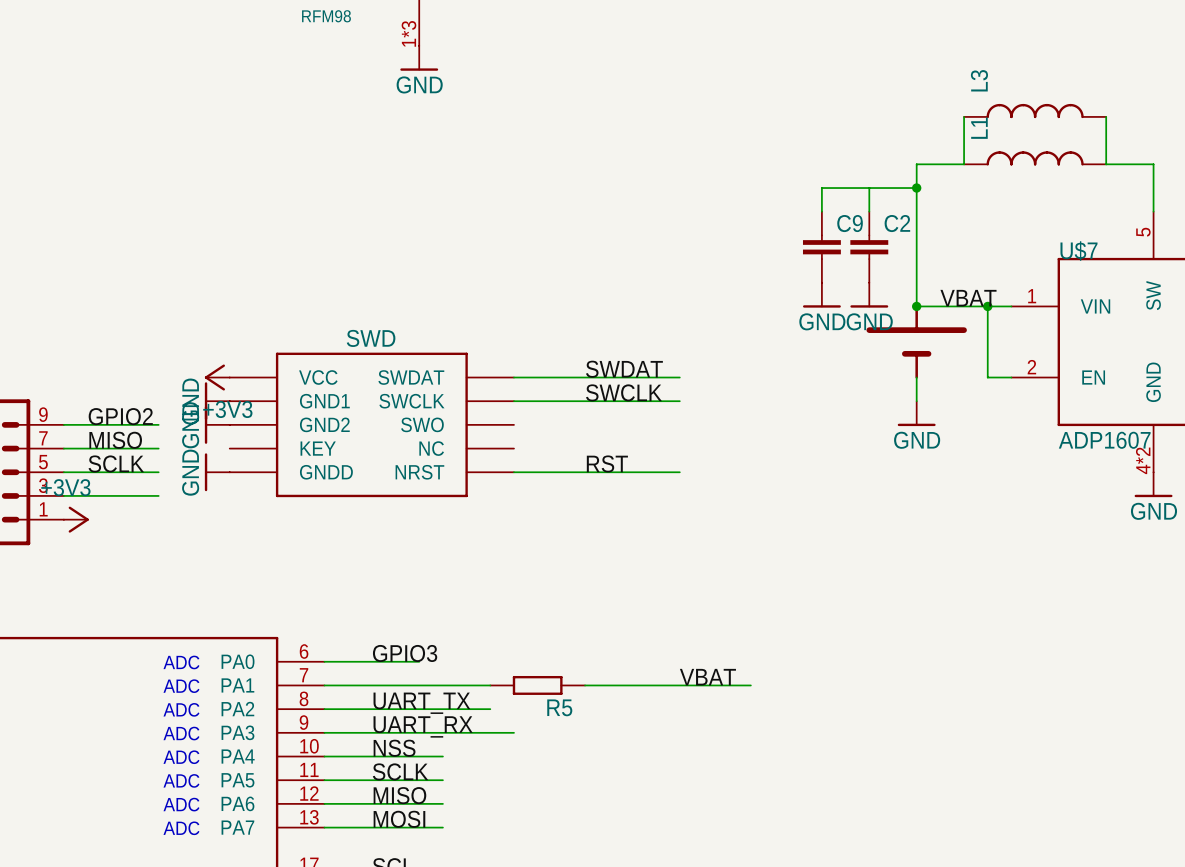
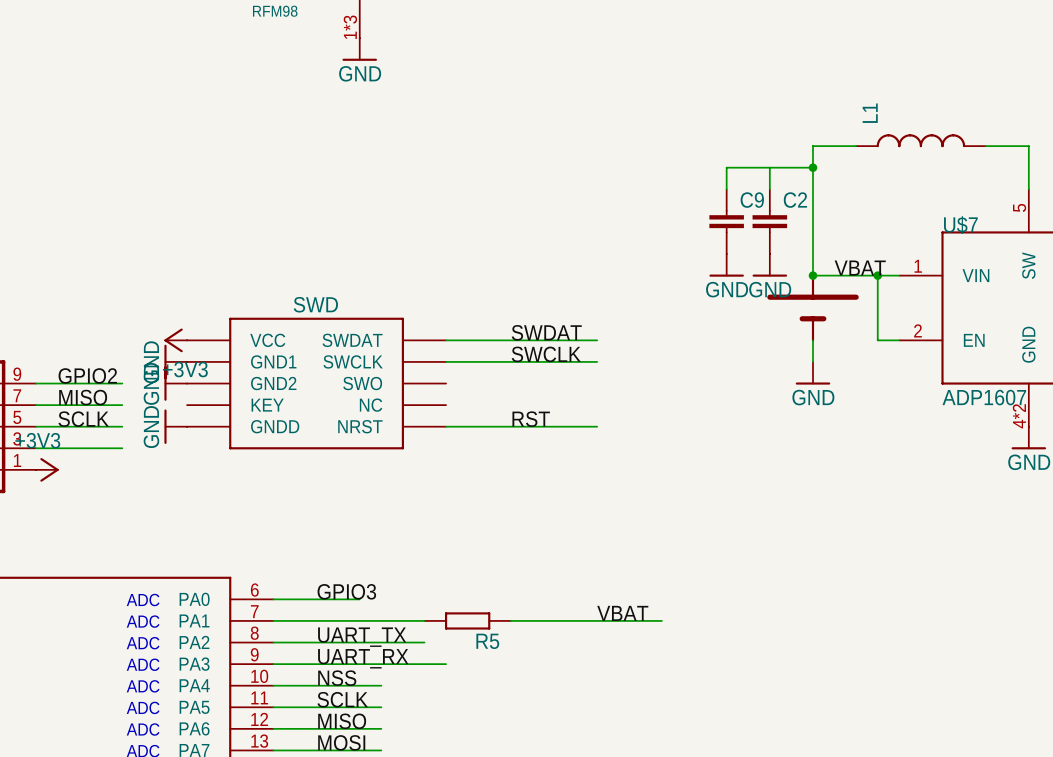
L3: (1035, 111) -> none
wire: (964, 116) (964, 164) -> none
wire: (1106, 116) (1106, 164) -> none

